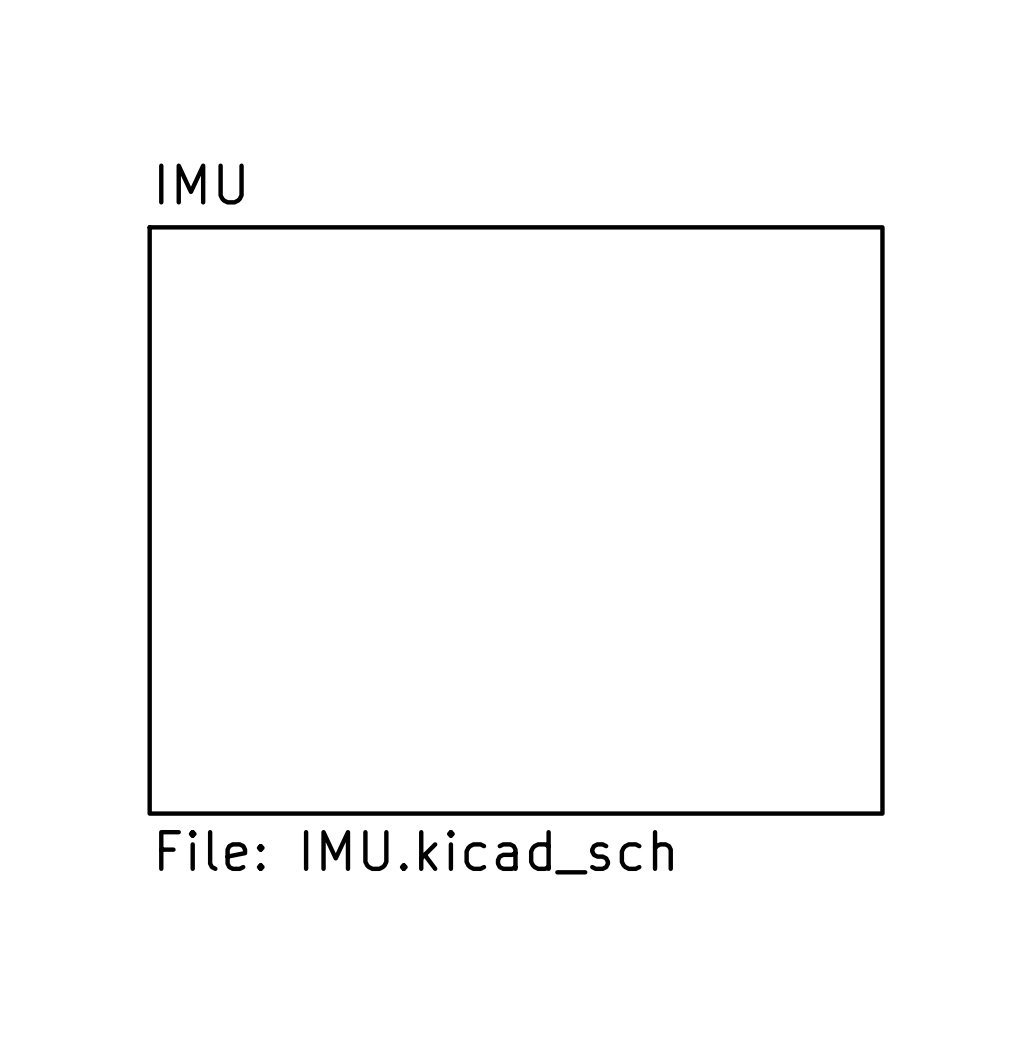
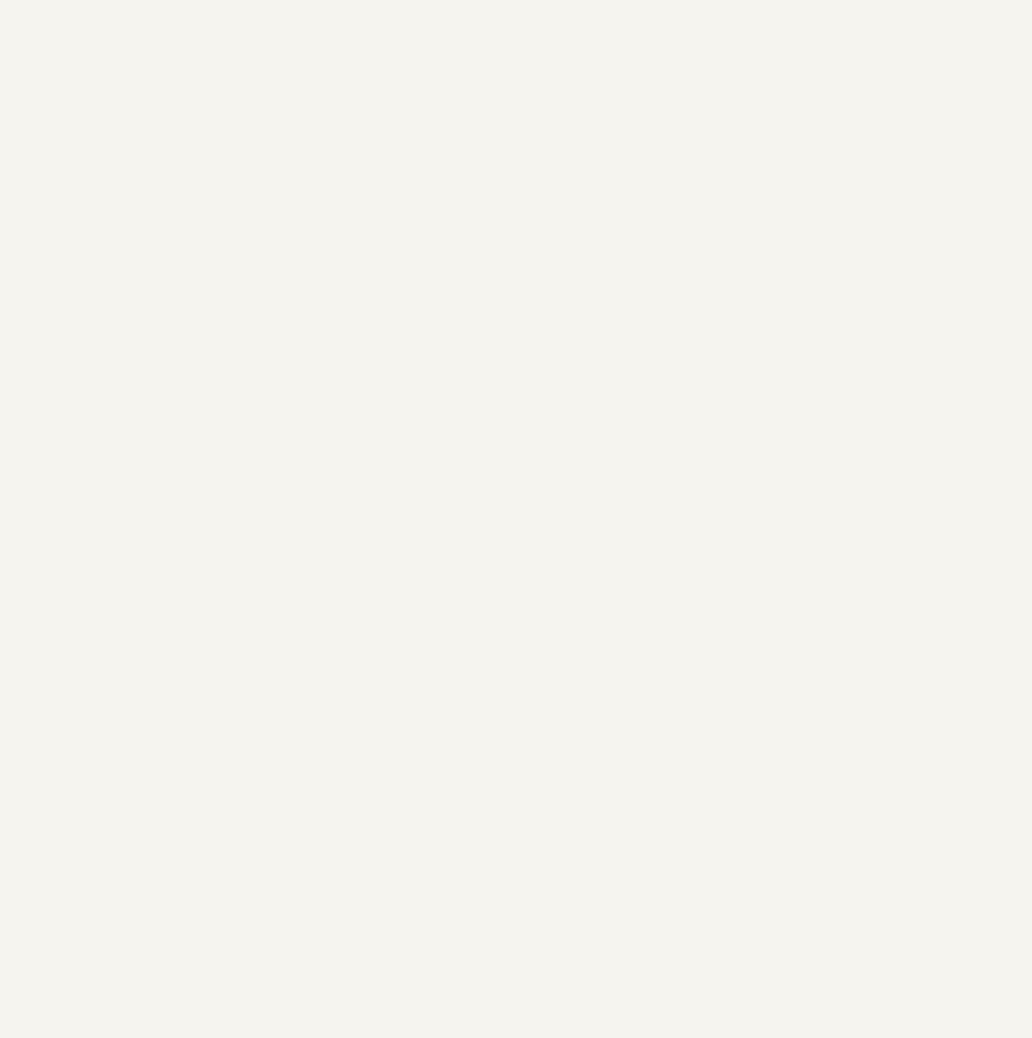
sheet IMU: File: IMU.kicad_sch (516, 520) -> none

